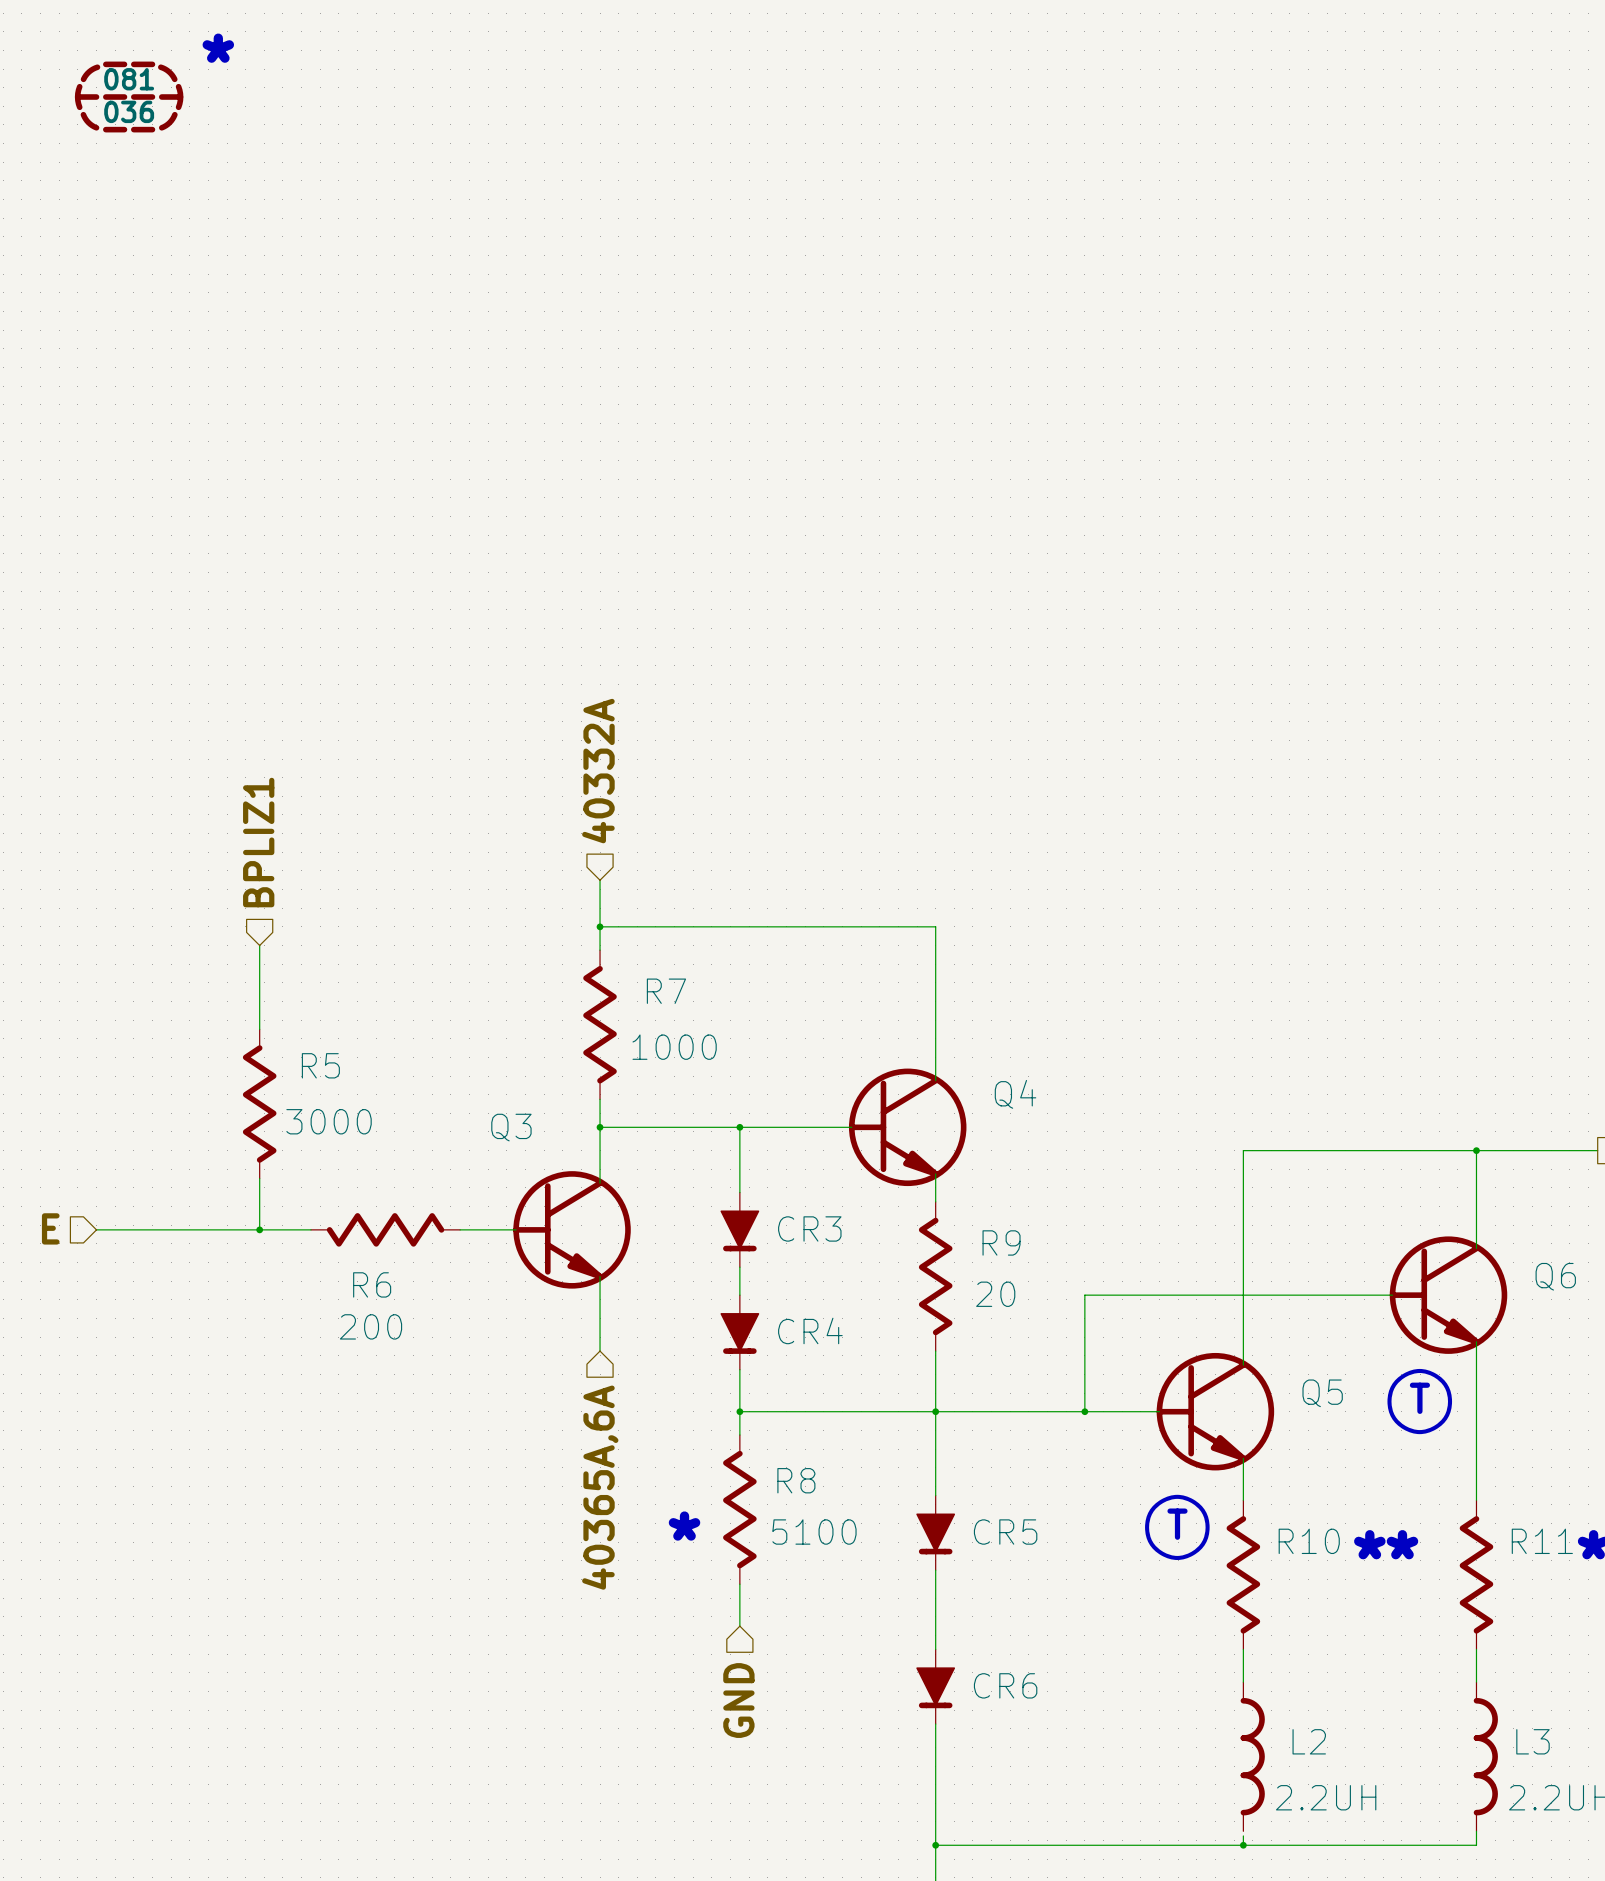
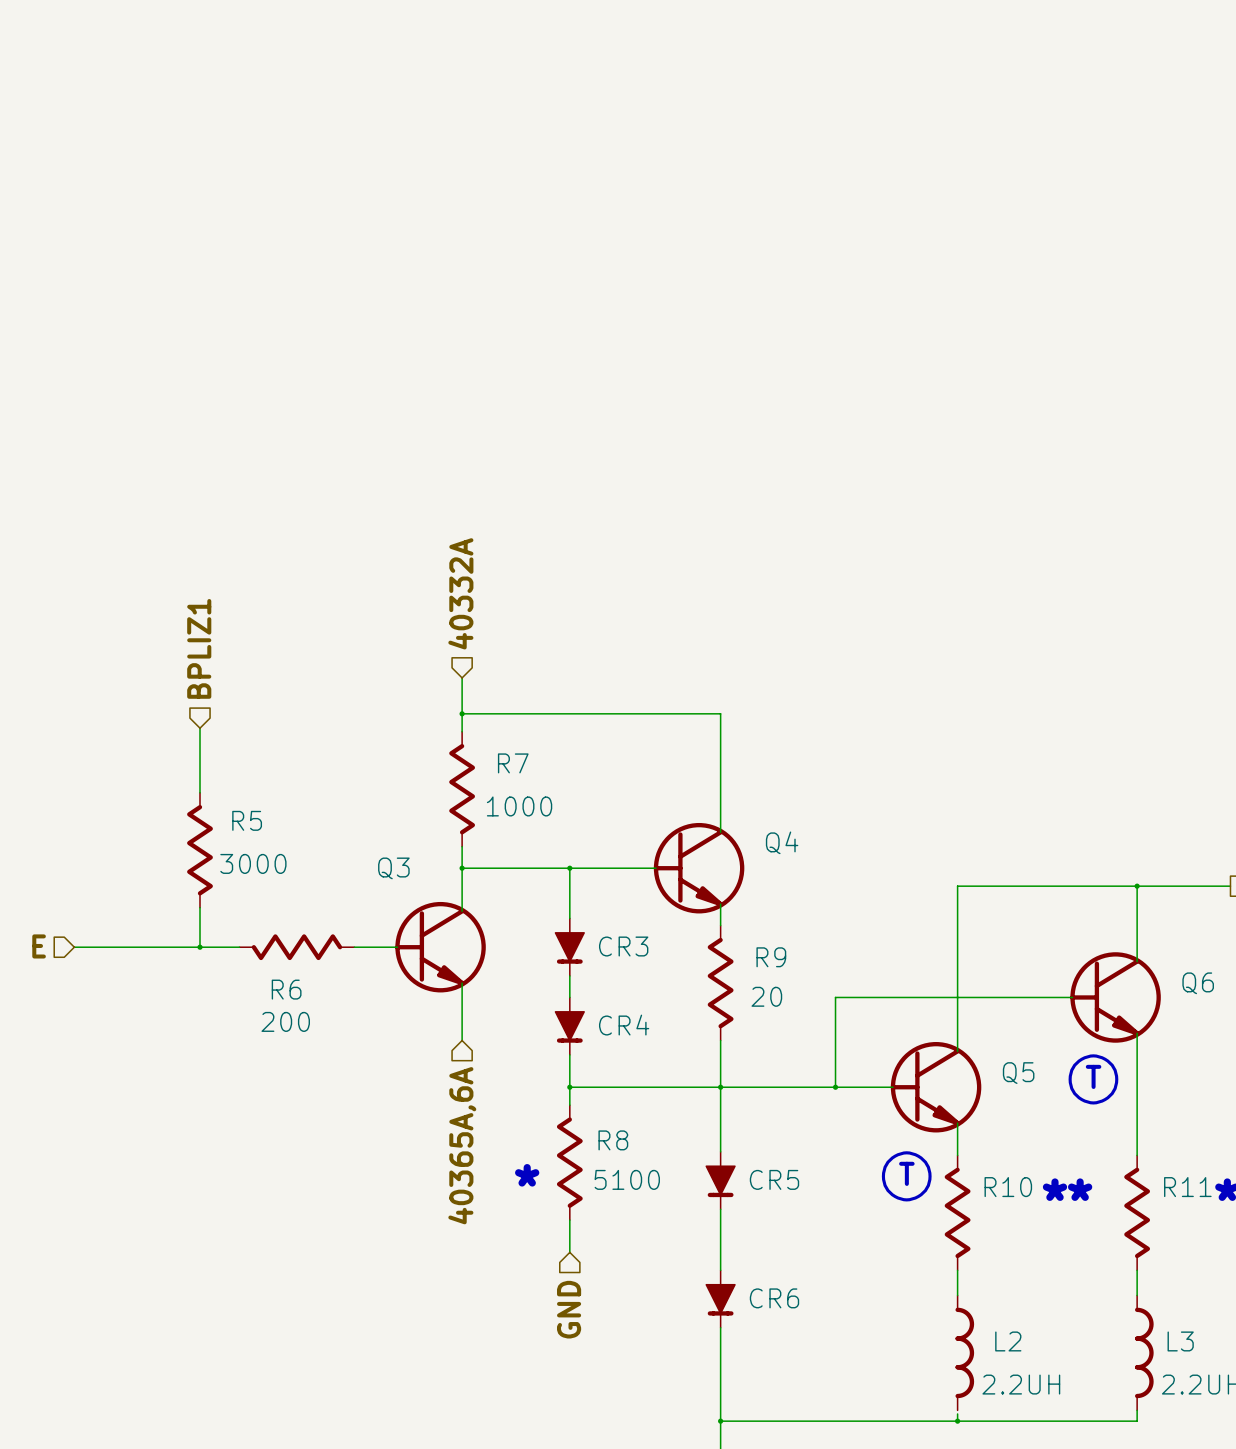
text: * (218, 48) -> none
part: (129, 97) -> none

